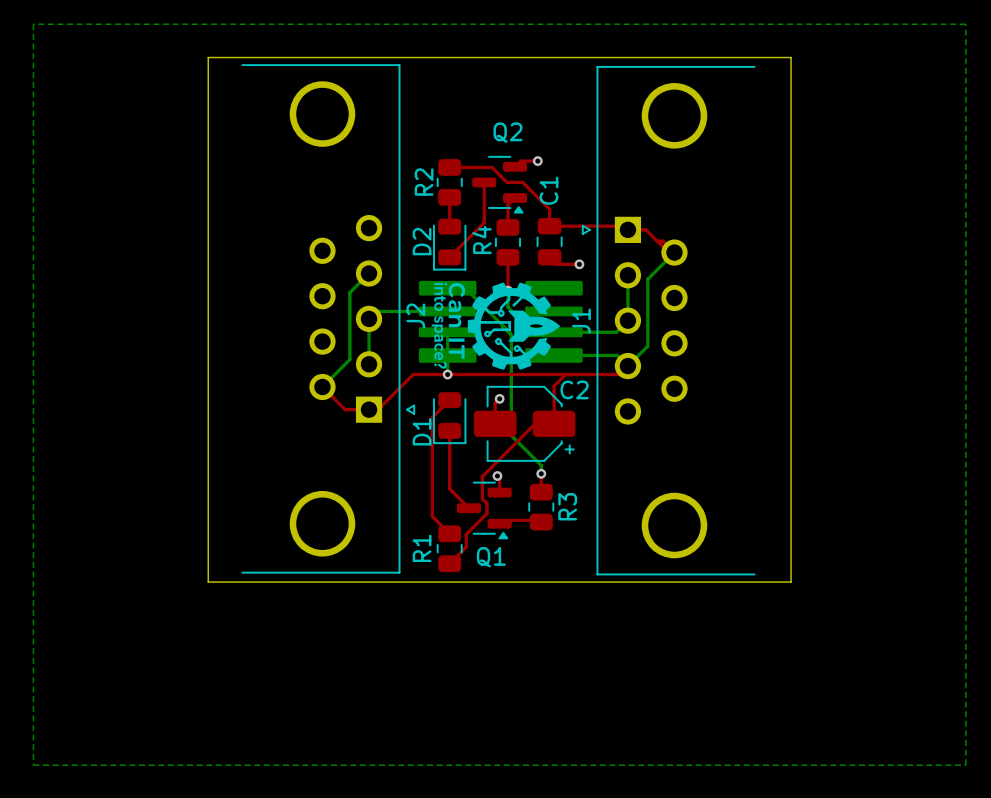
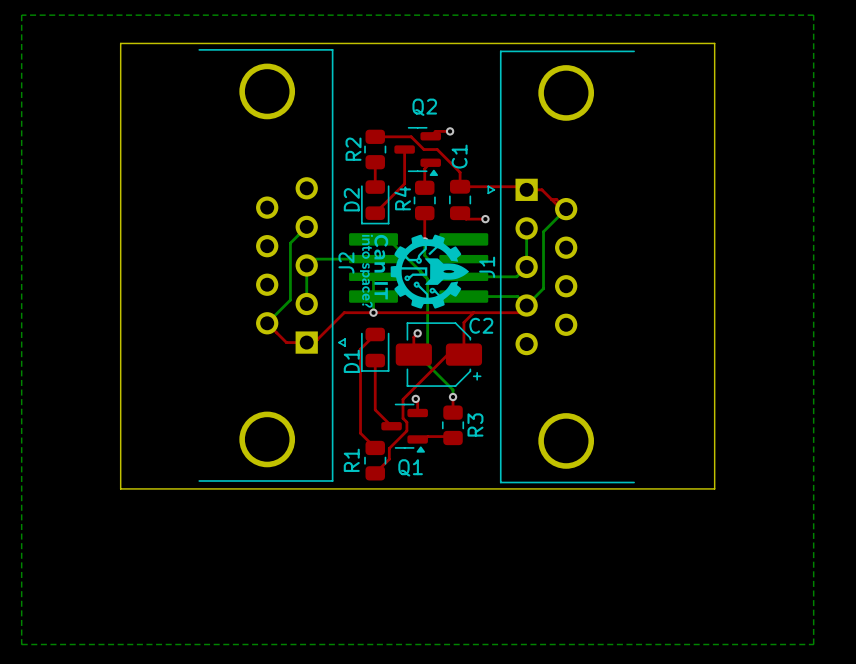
board edge: (208, 57) (208, 582) -> (170, 43) (120, 43) (120, 488) (170, 488)
board edge: (791, 57) (791, 582) -> (665, 43) (714, 43) (714, 488) (665, 488)

